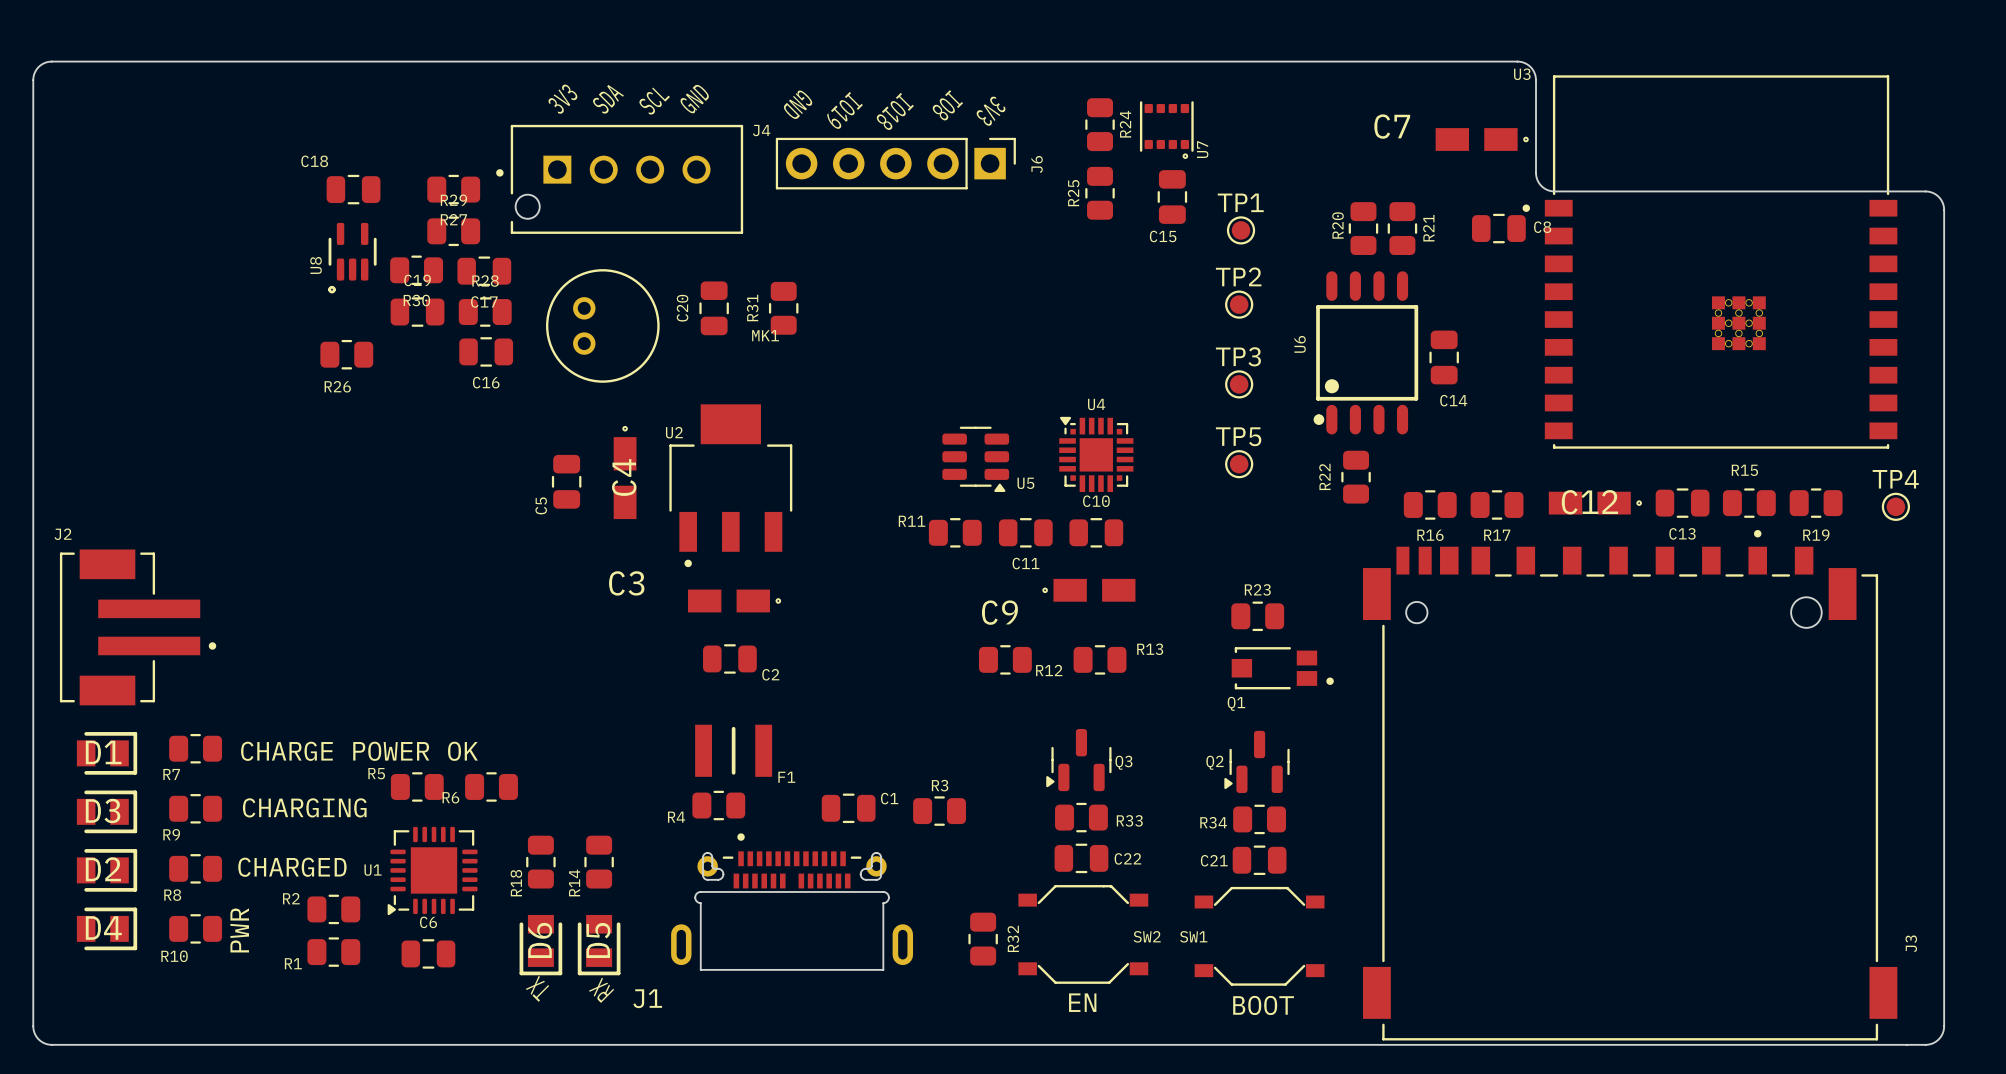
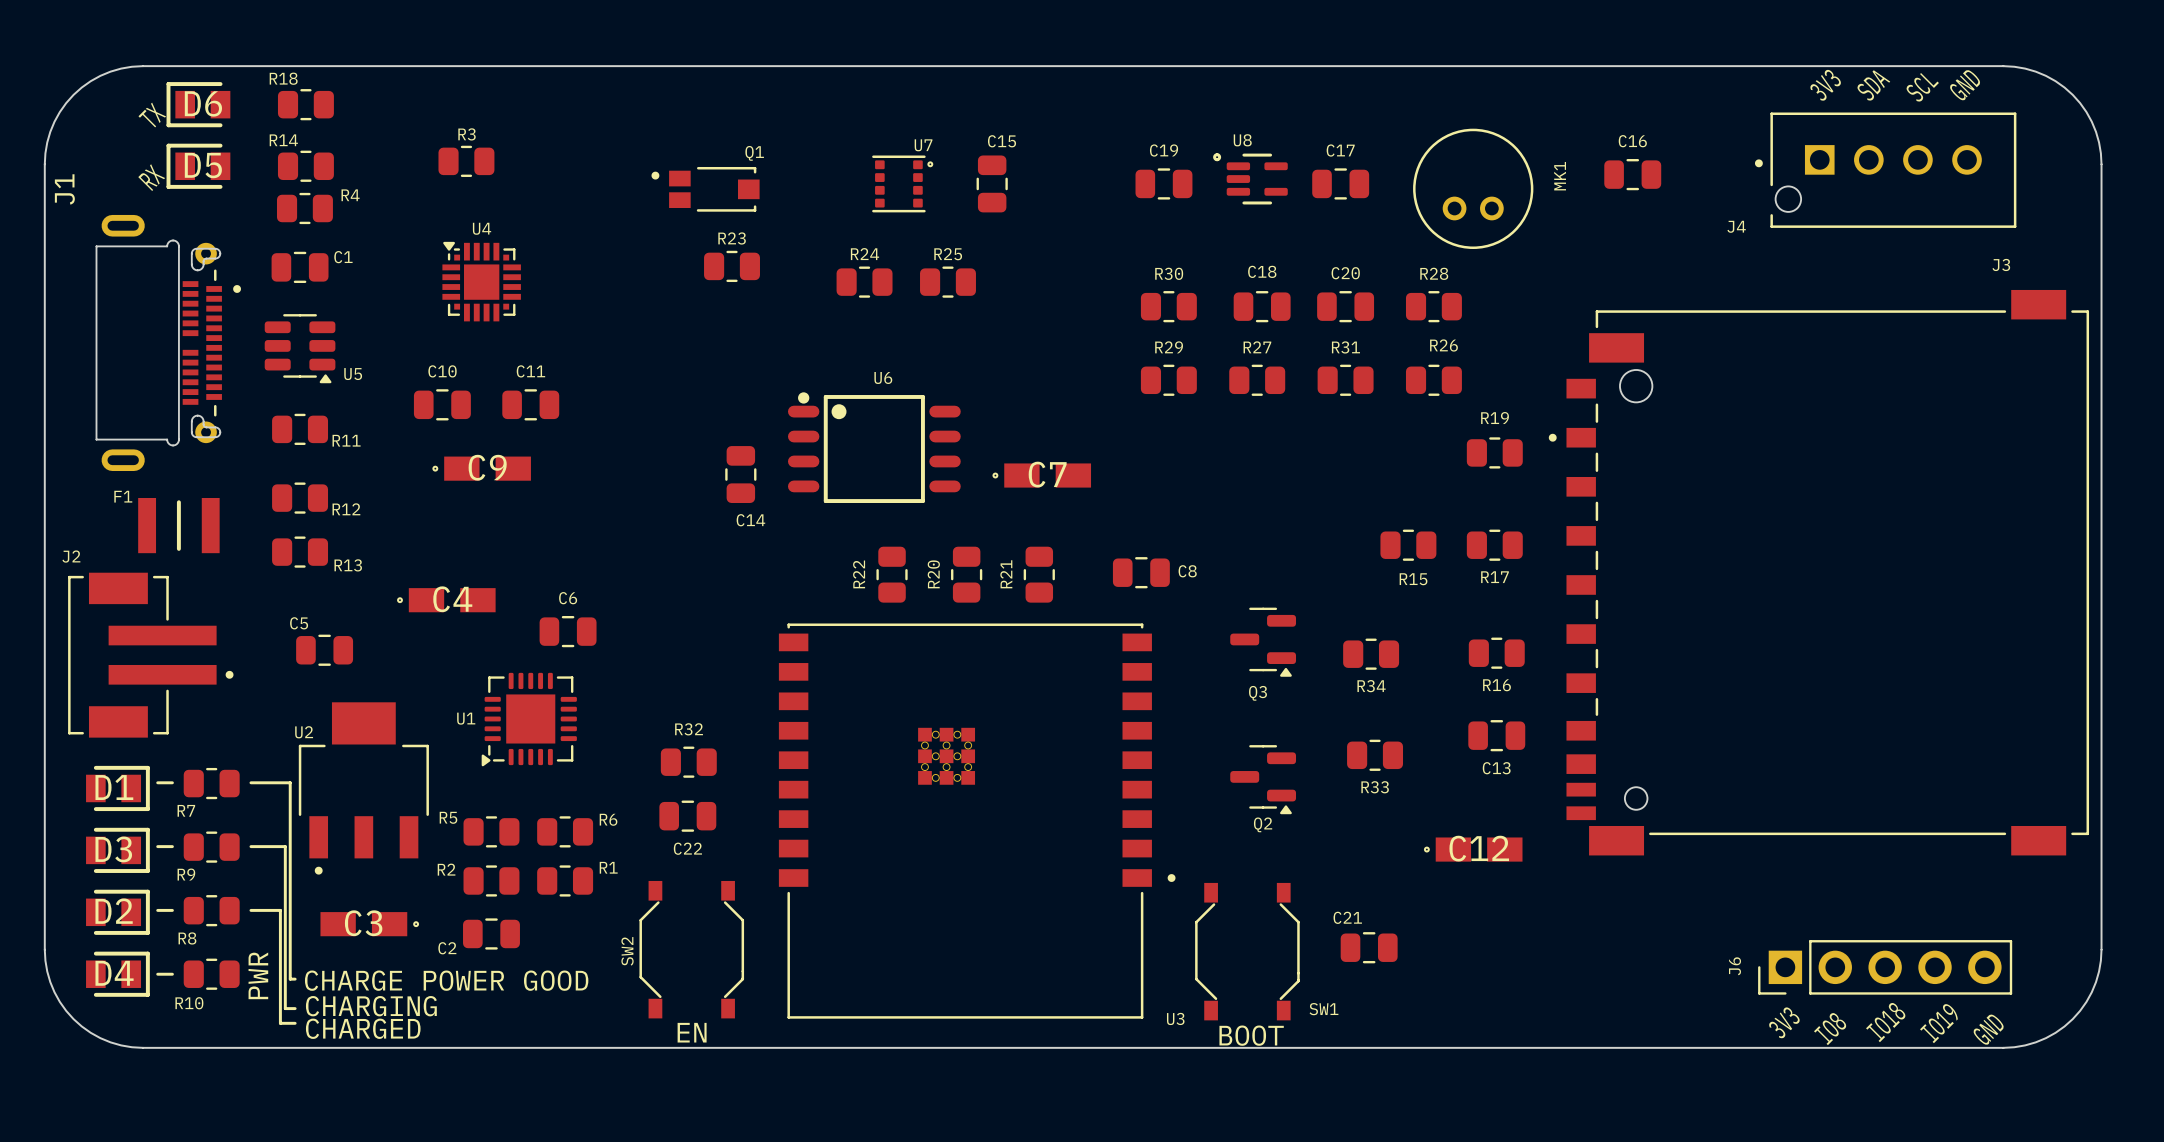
board edge: (51, 61) (1519, 61) (1530, 67) (1535, 76) (1536, 174) (1540, 184) (1548, 190) (1925, 191) (1933, 193) (1941, 200) (1944, 209) (1944, 1026) (1942, 1034) (1935, 1042) (1925, 1044) (51, 1044) (43, 1043) (36, 1036) (33, 1026) (33, 80) (38, 67) (51, 61) -> (142, 66) (110, 71) (90, 81) (73, 94) (59, 112) (50, 131) (44, 164) (45, 960) (50, 982) (59, 1001) (73, 1019) (100, 1038) (121, 1045) (142, 1047) (2003, 1047) (2025, 1045) (2055, 1032) (2072, 1019) (2091, 992) (2099, 971) (2101, 949) (2101, 164) (2099, 142) (2086, 112) (2064, 87) (2045, 75) (2025, 68) (2003, 66) (142, 66)
text: none -> 3V3 (1825, 85)
text: none -> GND (1965, 85)
text: none -> SDA (1873, 85)
text: none -> SCL (1922, 87)
text: 3V3 (562, 99) -> none
text: SDA (608, 99) -> none
text: GND (694, 99) -> none
text: SCL (654, 101) -> none
text: GND (798, 104) -> none
text: IO8 (947, 105) -> none
text: IO19 (845, 110) -> none
text: IO18 (895, 111) -> none
text: 3V3 (990, 111) -> none
text: none -> TX (152, 115)
R24 rotation: 0° (1100, 124) -> 90° clockwise (864, 282)
R24 position: (1100, 124) -> (864, 282)
C7 name position: C7 (1392, 126) -> C7 (1047, 474)
J4 name position: J4 (761, 130) -> J4 (1736, 226)
U7 rotation: 0° (1166, 130) -> 90° counterclockwise (902, 183)
U7 position: (1166, 130) -> (902, 183)
C7 rotation: 0° (1482, 139) -> 180° (1041, 475)
C7 position: (1482, 139) -> (1041, 475)
C18 name position: C18 (314, 161) -> C18 (1262, 271)
J6 rotation: 0° (895, 163) -> 180° (1885, 967)
J6 position: (895, 163) -> (1885, 967)
text: none -> RX (151, 177)
J4 position: (619, 179) -> (1885, 170)
C18 position: (353, 189) -> (1262, 306)
R27 position: (453, 189) -> (1257, 380)
R25 rotation: 0° (1100, 193) -> 90° clockwise (947, 282)
R25 position: (1100, 193) -> (947, 282)
C15 position: (1172, 197) -> (992, 183)
R27 name position: R27 (453, 219) -> R27 (1257, 347)
R20 name position: R20 (1338, 225) -> R20 (933, 574)
R20 position: (1363, 228) -> (966, 574)
R21 position: (1402, 228) -> (1039, 574)
R21 name position: R21 (1428, 228) -> R21 (1006, 574)
C8 position: (1498, 228) -> (1141, 572)
TP1: (1241, 230) -> none
R29 position: (453, 231) -> (1168, 380)
C15 name position: C15 (1163, 236) -> C15 (1002, 141)
U8 rotation: 0° (352, 258) -> 90° clockwise (1250, 178)
U8 position: (352, 258) -> (1250, 178)
U3 rotation: 0° (1709, 262) -> 180° (977, 821)
U3 position: (1709, 262) -> (977, 821)
R30 position: (416, 270) -> (1168, 306)
C17 position: (484, 271) -> (1340, 183)
R30 name position: R30 (416, 300) -> R30 (1169, 273)
C17 name position: C17 (484, 301) -> C17 (1340, 150)
TP2: (1239, 304) -> none
C20 rotation: 0° (714, 308) -> 90° clockwise (1345, 306)
C20 position: (714, 308) -> (1345, 306)
R31 rotation: 0° (783, 308) -> 90° clockwise (1345, 380)
R31 position: (783, 308) -> (1345, 380)
C19 position: (417, 312) -> (1163, 183)
R28 position: (485, 312) -> (1433, 306)
MK1 rotation: 0° (602, 325) -> 90° counterclockwise (1473, 188)
MK1 position: (602, 325) -> (1473, 188)
MK1 name position: MK1 (765, 335) -> MK1 (1560, 176)
C16 position: (486, 351) -> (1632, 174)
U6 rotation: 0° (1365, 352) -> 90° clockwise (874, 447)
U6 position: (1365, 352) -> (874, 447)
R26 position: (346, 354) -> (1433, 380)
C14 position: (1444, 357) -> (740, 474)
C16 name position: C16 (486, 382) -> C16 (1632, 141)
TP3: (1239, 384) -> none
R26 name position: R26 (337, 386) -> R26 (1443, 345)
U4 position: (1096, 454) -> (481, 281)
U5 position: (975, 459) -> (300, 348)
TP5: (1239, 464) -> none
R15 name position: R15 (1744, 470) -> R15 (1413, 579)
C4 rotation: 0° (625, 472) -> 90° counterclockwise (446, 600)
C4 position: (625, 472) -> (446, 600)
R22 position: (1356, 477) -> (892, 574)
C5 rotation: 0° (566, 481) -> 90° clockwise (324, 650)
C5 position: (566, 481) -> (324, 650)
U2 position: (730, 485) -> (363, 788)
C12 rotation: 0° (1595, 503) -> 180° (1473, 849)
C12 position: (1595, 503) -> (1473, 849)
C13 position: (1682, 503) -> (1496, 735)
R15 position: (1749, 503) -> (1408, 545)
R19 position: (1816, 503) -> (1494, 452)
R16 position: (1430, 504) -> (1496, 653)
R17 position: (1497, 504) -> (1494, 545)
TP4: (1895, 506) -> none
R11 name position: R11 (912, 521) -> R11 (346, 440)
R11 position: (955, 532) -> (300, 429)
C11 position: (1025, 532) -> (530, 404)
C10 position: (1096, 532) -> (442, 404)
R19 name position: R19 (1816, 535) -> R19 (1495, 418)
C11 name position: C11 (1026, 563) -> C11 (530, 371)
C3 name position: C3 (626, 583) -> C3 (363, 923)
C9 position: (1088, 590) -> (481, 468)
C3 position: (734, 600) -> (369, 924)
C9 name position: C9 (999, 612) -> C9 (487, 467)
R23 position: (1257, 616) -> (732, 266)
R13 name position: R13 (1150, 649) -> R13 (348, 565)
C2 position: (729, 658) -> (491, 933)
R12 position: (1005, 659) -> (300, 498)
R13 position: (1100, 659) -> (300, 552)
Q1 rotation: 0° (1282, 668) -> 180° (705, 189)
Q1 position: (1282, 668) -> (705, 189)
C2 name position: C2 (770, 674) -> C2 (447, 948)
line: none -> (157, 782) (172, 782)
line: none -> (250, 782) (290, 782) (290, 979) (295, 979)
F1 position: (733, 750) -> (178, 525)
text: CHARGE POWER OK (359, 751) -> none
Q3 rotation: 0° (1078, 760) -> 90° counterclockwise (1263, 642)
Q3 position: (1078, 760) -> (1263, 642)
Q2 rotation: 0° (1256, 761) -> 90° counterclockwise (1263, 779)
Q2 position: (1256, 761) -> (1263, 779)
Q3 name position: Q3 (1123, 762) -> Q3 (1257, 693)
F1 name position: F1 (786, 777) -> F1 (123, 496)
J3 rotation: 0° (1630, 785) -> 90° counterclockwise (1818, 572)
R5 position: (417, 786) -> (491, 831)
R6 position: (491, 786) -> (565, 831)
R6 name position: R6 (450, 797) -> R6 (608, 819)
R4 position: (718, 805) -> (304, 208)
text position: CHARGING (304, 807) -> CHARGING (371, 1006)
line: none -> (157, 846) (172, 846)
line: none -> (250, 846) (285, 846) (285, 1008) (295, 1008)
C1 position: (848, 808) -> (300, 267)
R3 position: (939, 811) -> (466, 161)
R4 name position: R4 (676, 817) -> R4 (350, 195)
R33 position: (1081, 817) -> (1375, 755)
R34 position: (1259, 819) -> (1371, 654)
R33 name position: R33 (1129, 820) -> R33 (1375, 787)
R34 name position: R34 (1213, 822) -> R34 (1371, 686)
C22 position: (1081, 858) -> (687, 816)
C22 name position: C22 (1127, 858) -> C22 (687, 848)
C21 name position: C21 (1214, 860) -> C21 (1347, 917)
C21 position: (1259, 860) -> (1369, 947)
R18 rotation: 0° (540, 862) -> 90° clockwise (305, 104)
R18 position: (540, 862) -> (305, 104)
R14 rotation: 0° (599, 862) -> 90° clockwise (305, 166)
R14 position: (599, 862) -> (305, 166)
text position: CHARGED (292, 867) -> CHARGED (363, 1028)
line: none -> (157, 910) (172, 910)
line: none -> (250, 910) (280, 910) (280, 1023) (295, 1023)
U1 position: (432, 871) -> (529, 719)
J1 rotation: 0° (792, 901) -> 90° clockwise (168, 342)
J1 position: (792, 901) -> (168, 342)
R2 position: (333, 909) -> (491, 880)
line: none -> (157, 974) (172, 974)
text: none -> CHARGE POWER GOOD (446, 980)
SW2 rotation: 0° (1083, 934) -> 90° clockwise (691, 949)
SW2 position: (1083, 934) -> (691, 949)
SW2 name position: SW2 (1147, 936) -> SW2 (627, 951)
SW1 name position: SW1 (1193, 936) -> SW1 (1323, 1009)
SW1 rotation: 0° (1259, 936) -> 90° clockwise (1247, 951)
SW1 position: (1259, 936) -> (1247, 951)
R32 name position: R32 (1013, 938) -> R32 (689, 729)
R32 rotation: 0° (983, 939) -> 90° clockwise (688, 762)
R32 position: (983, 939) -> (688, 762)
D6 rotation: 0° (540, 945) -> 90° clockwise (198, 104)
D6 position: (540, 945) -> (198, 104)
D5 rotation: 0° (599, 945) -> 90° clockwise (198, 166)
D5 position: (599, 945) -> (198, 166)
R1 position: (333, 952) -> (565, 880)
C6 position: (428, 953) -> (568, 631)
R1 name position: R1 (293, 963) -> R1 (608, 867)
text: none -> 3V3 (1784, 1022)
text: none -> IO18 (1885, 1022)
text: none -> IO19 (1938, 1023)
text: none -> IO8 (1830, 1029)
text: none -> GND (1988, 1029)
text: TX (537, 988) -> none
text: RX (601, 990) -> none
text position: EN (1082, 1002) -> EN (692, 1032)
text position: BOOT (1263, 1005) -> BOOT (1251, 1035)

